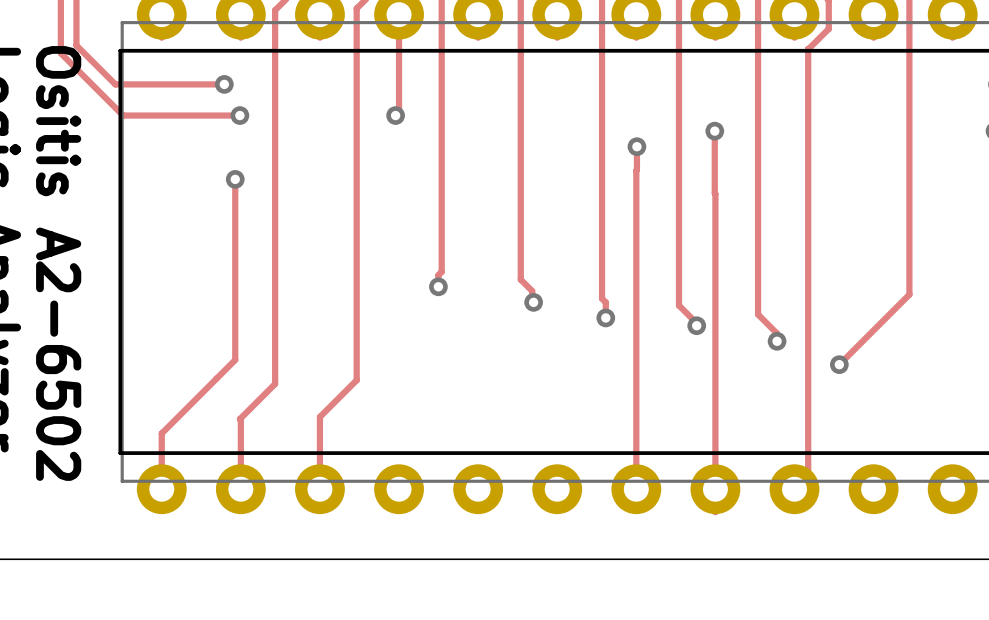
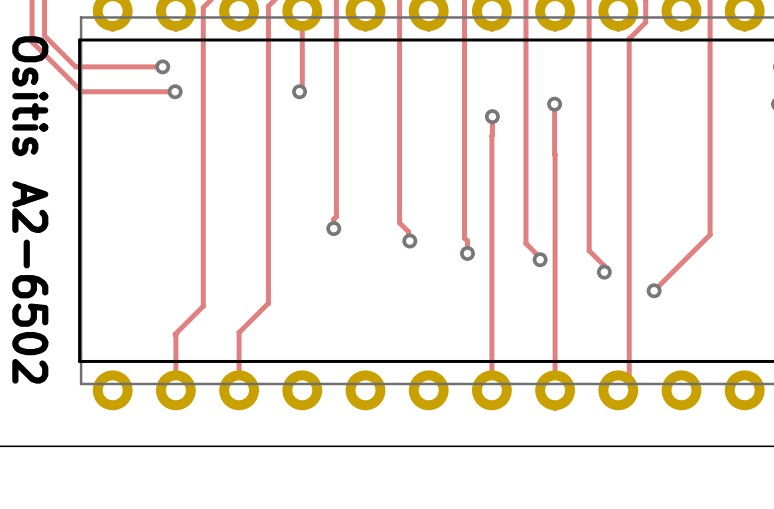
track: (235, 179) (235, 359) (161, 433) (161, 489) -> none
via: (235, 179) -> none

